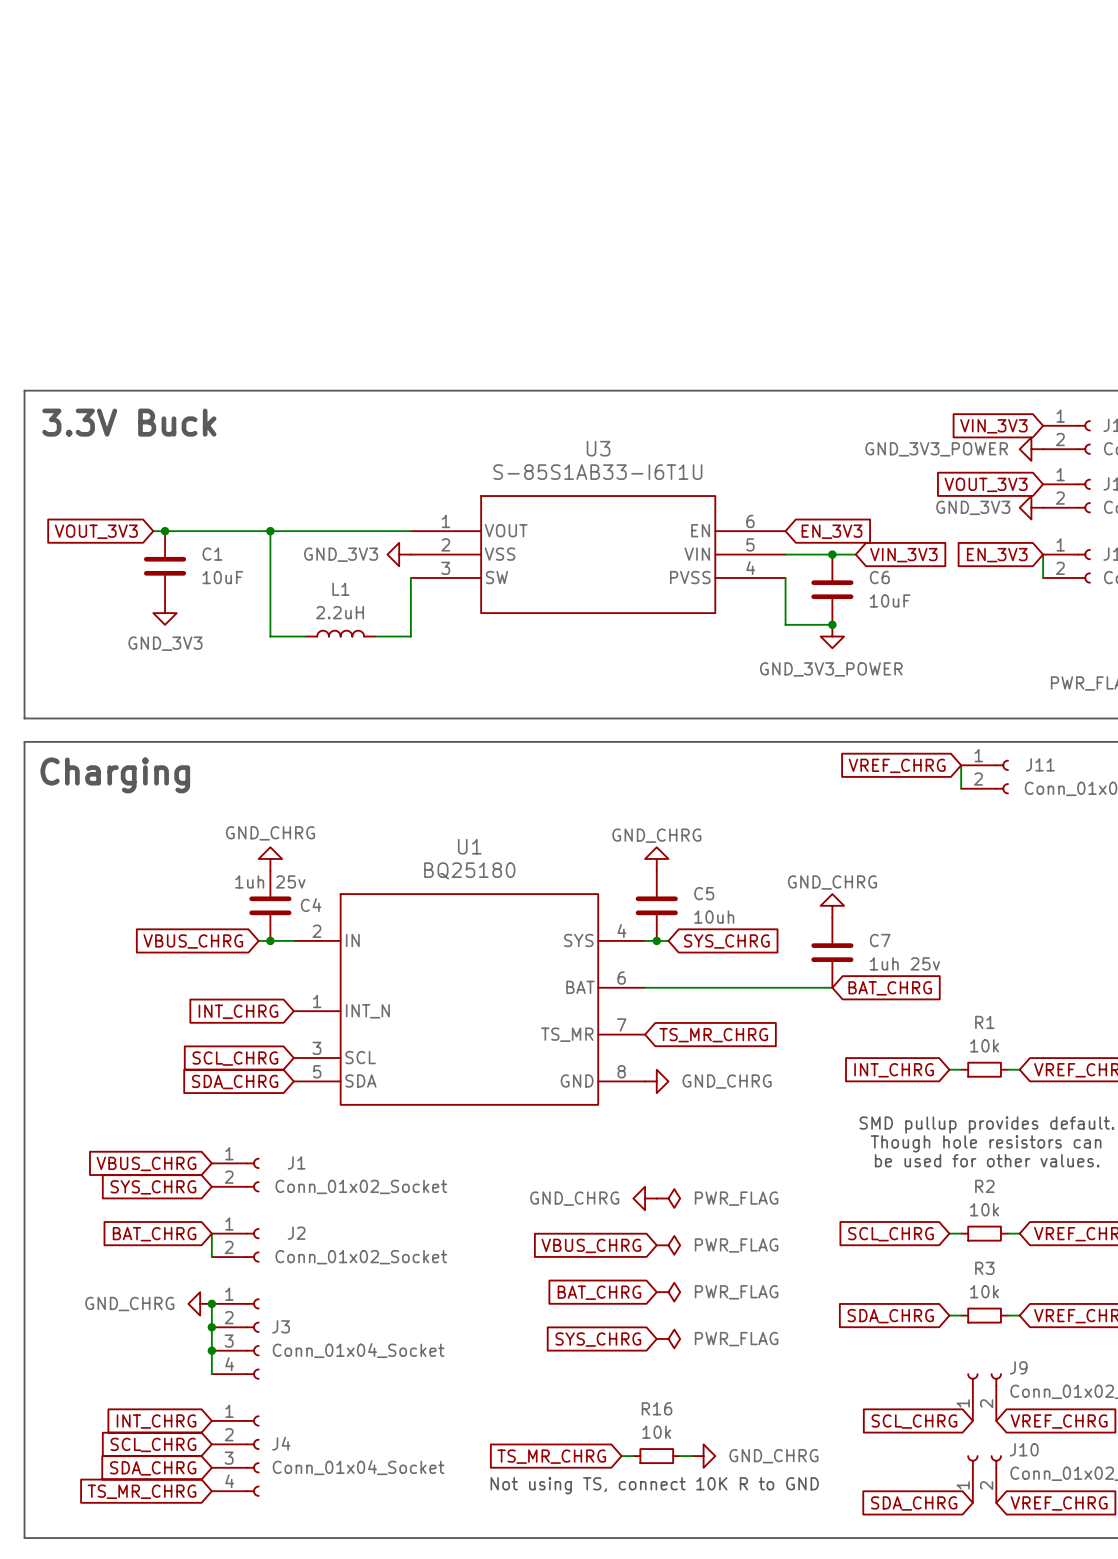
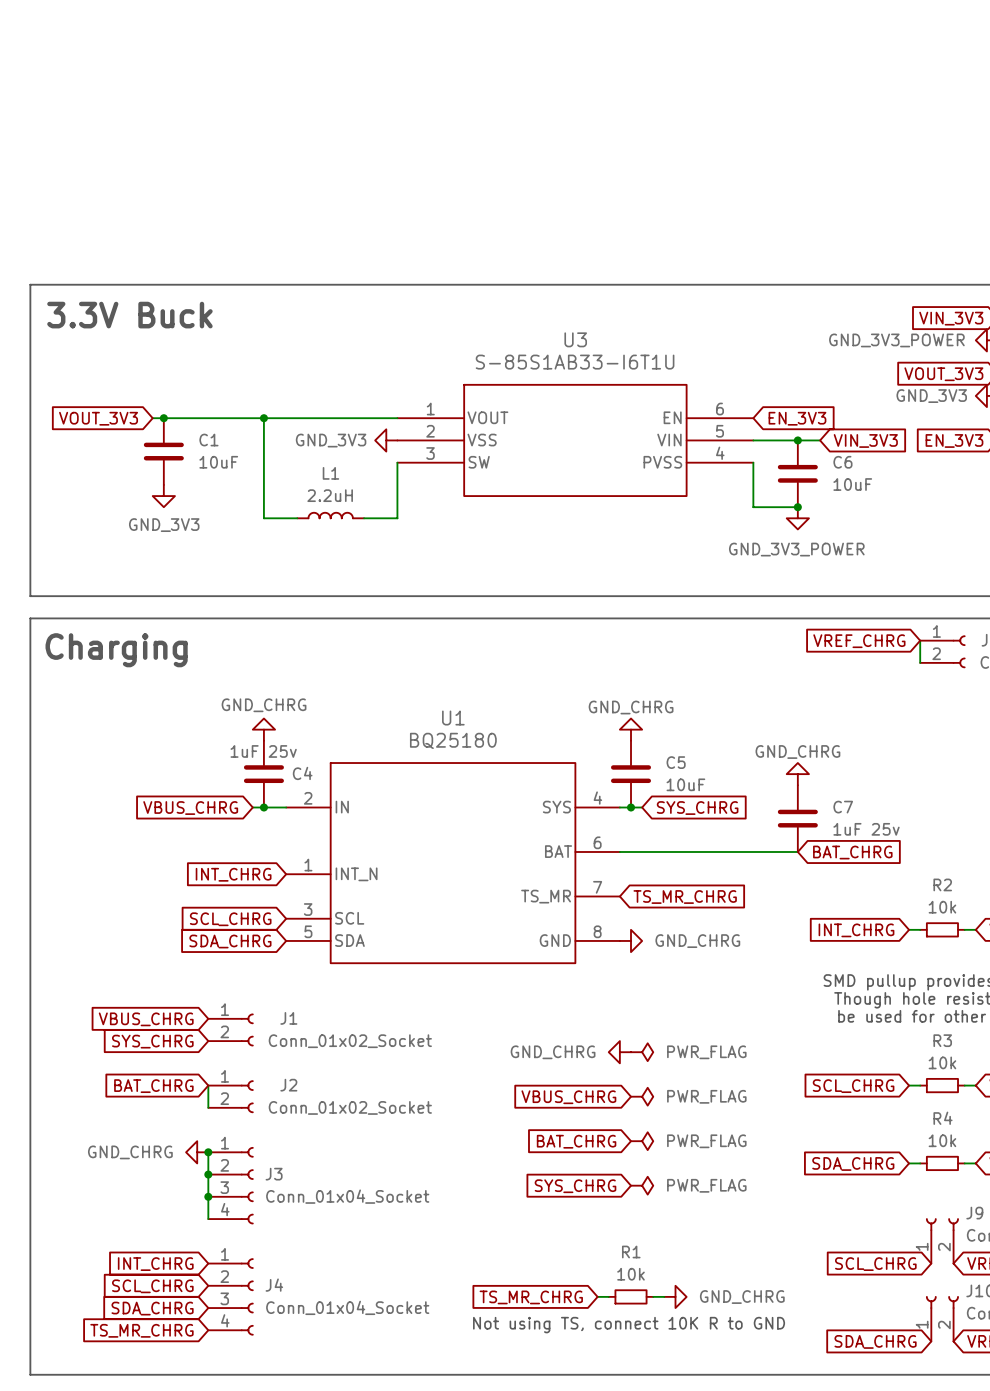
C4 value: 1uh 25v (270, 881) -> 1uF 25v (263, 751)
C5 value: 10uh (714, 917) -> 10uF (685, 784)
C7 value: 1uh 25v (904, 963) -> 1uF 25v (866, 829)
R1 name: R1 (984, 1022) -> R2 (942, 884)
R2 name: R2 (984, 1186) -> R3 (942, 1040)
R3 name: R3 (984, 1268) -> R4 (942, 1118)
R16 name: R16 (657, 1408) -> R1 (631, 1252)

